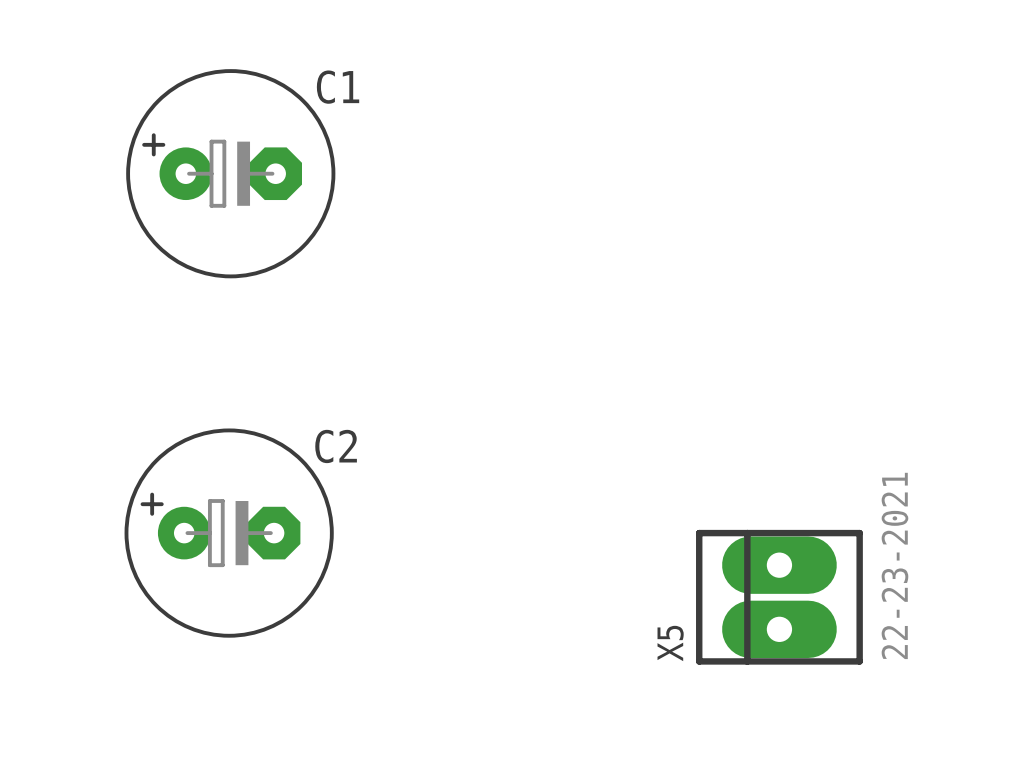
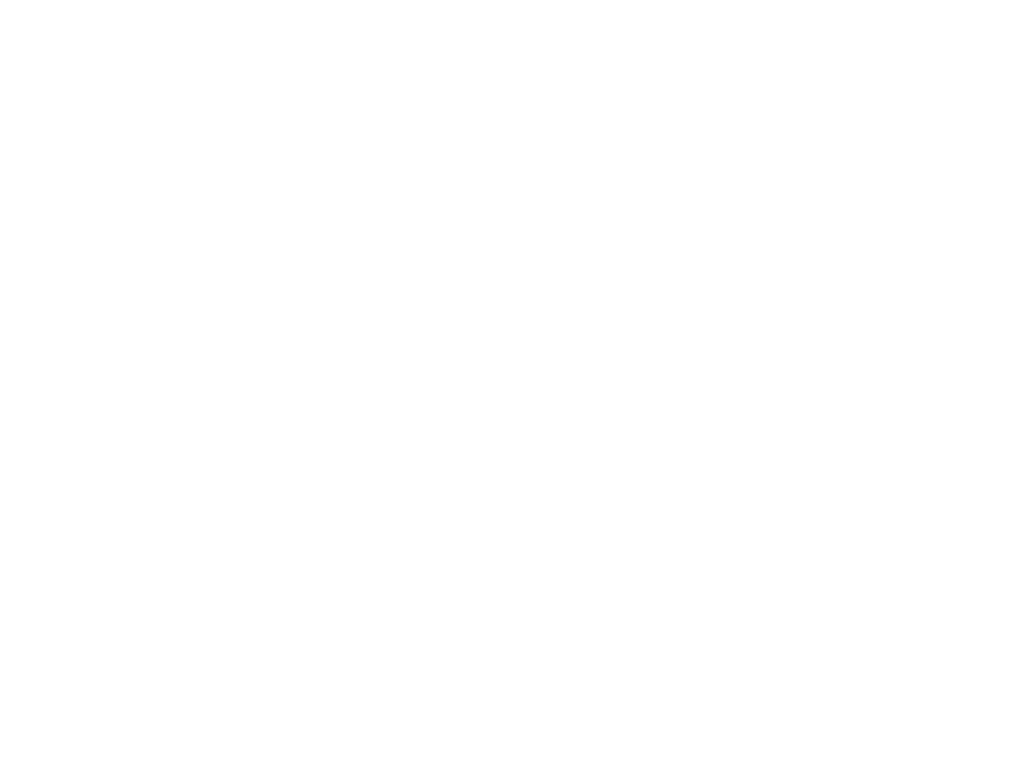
C1: (230, 173) -> none
C2: (229, 533) -> none
X5: 22-23-2021 (779, 597) -> none

